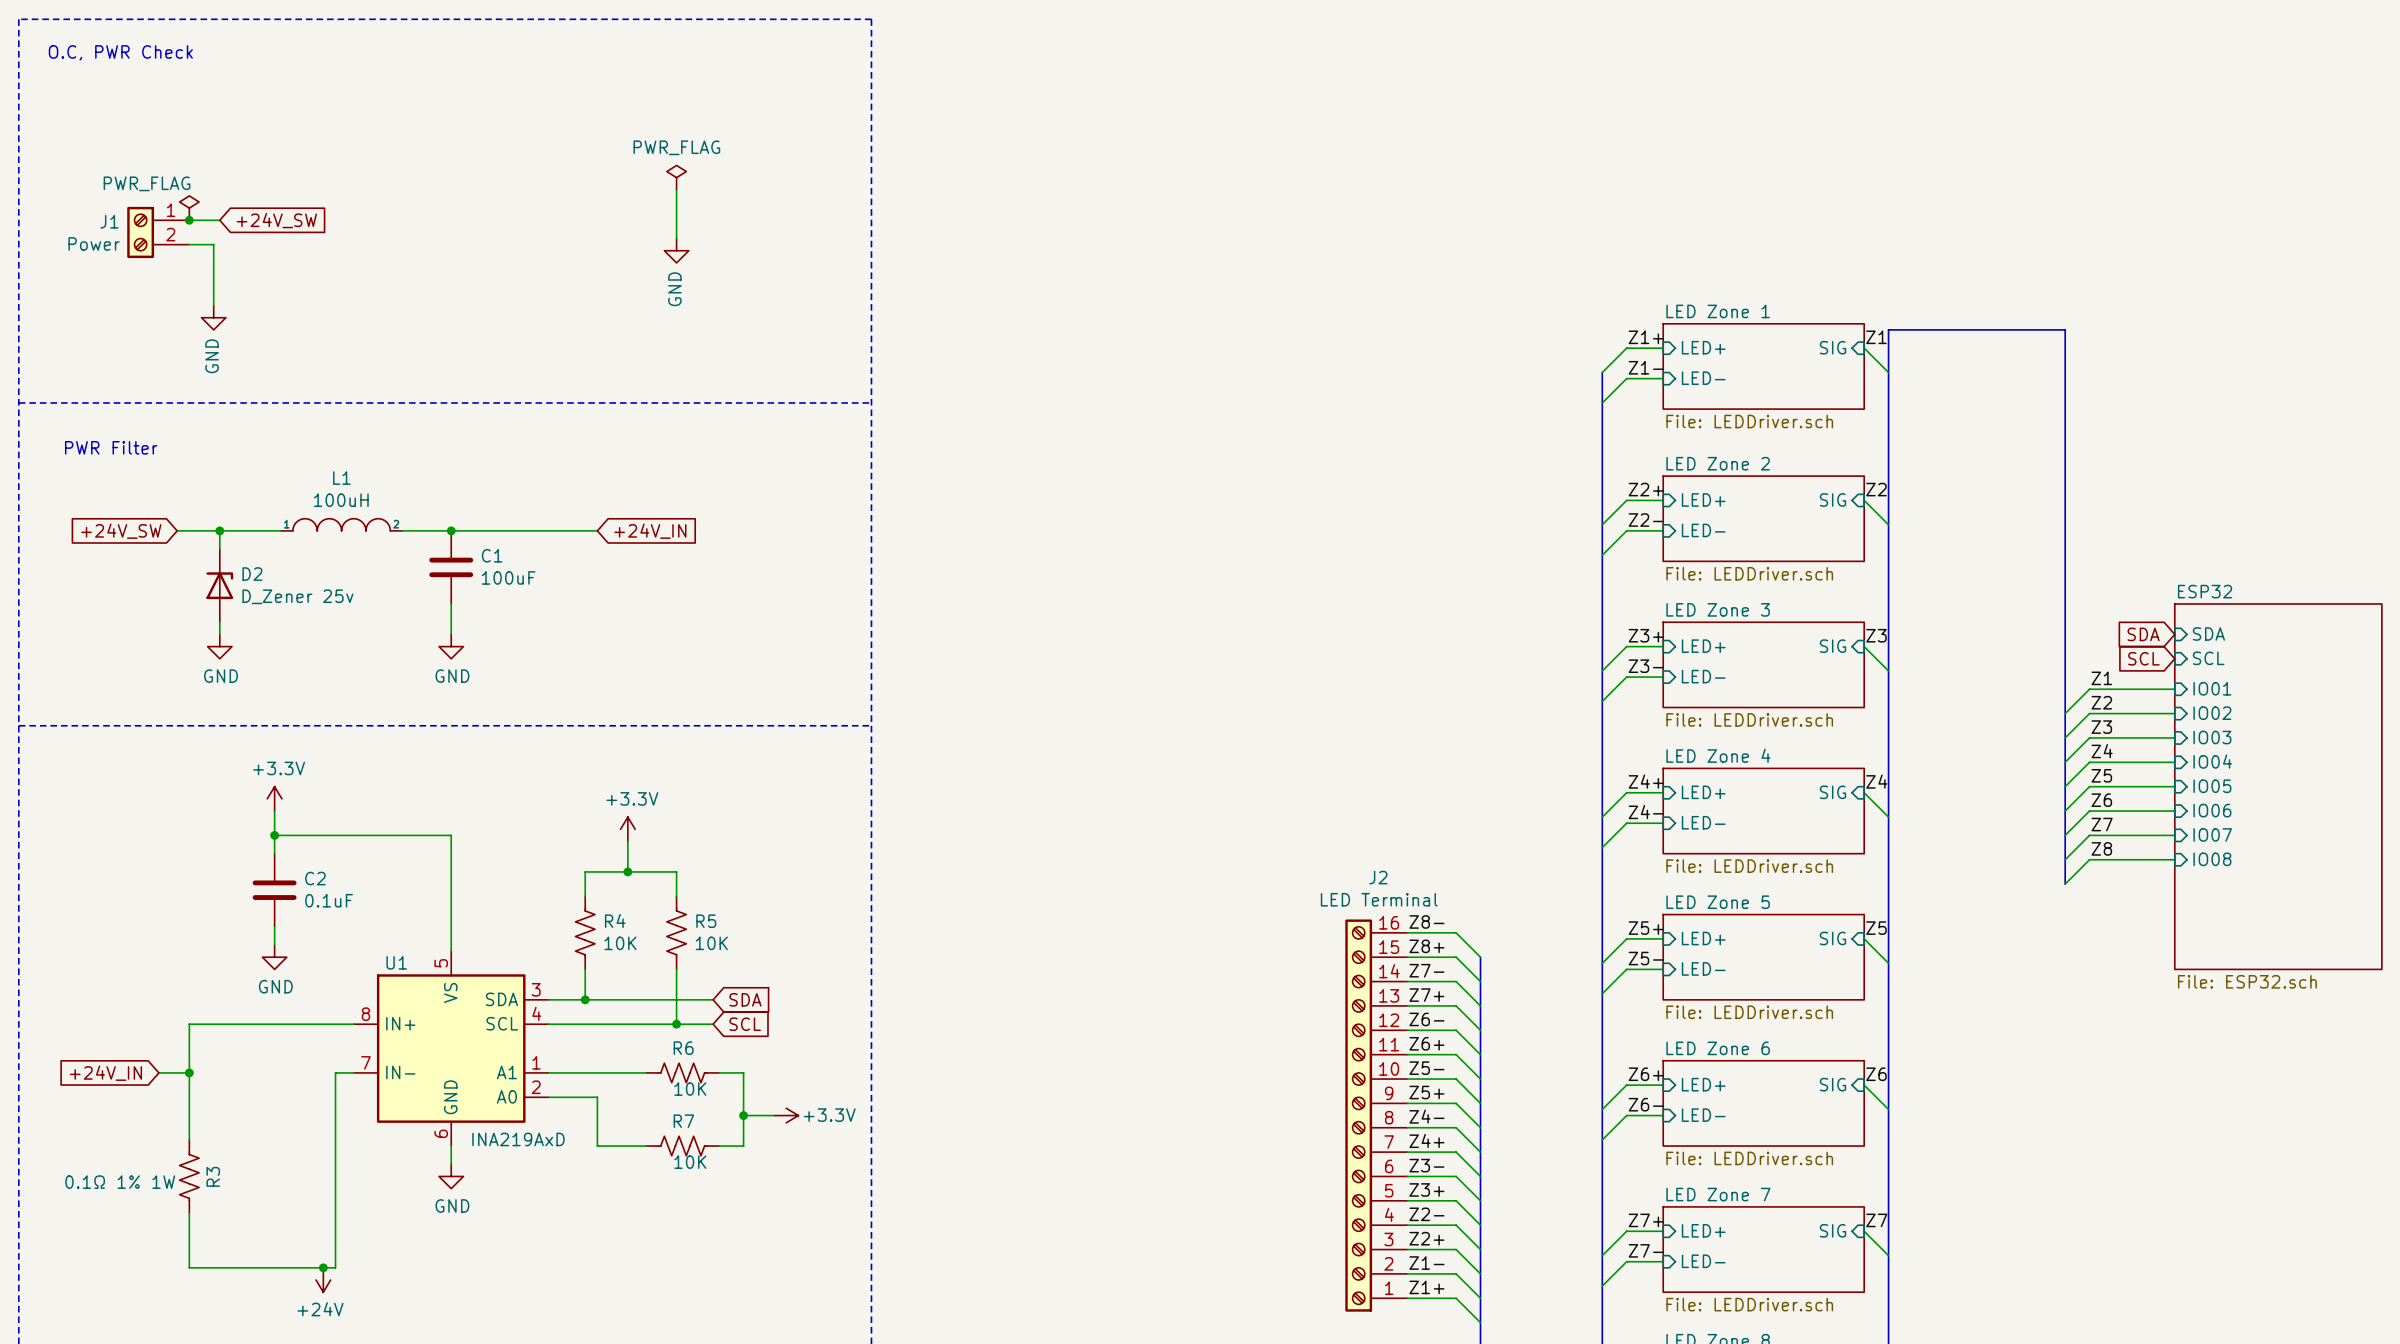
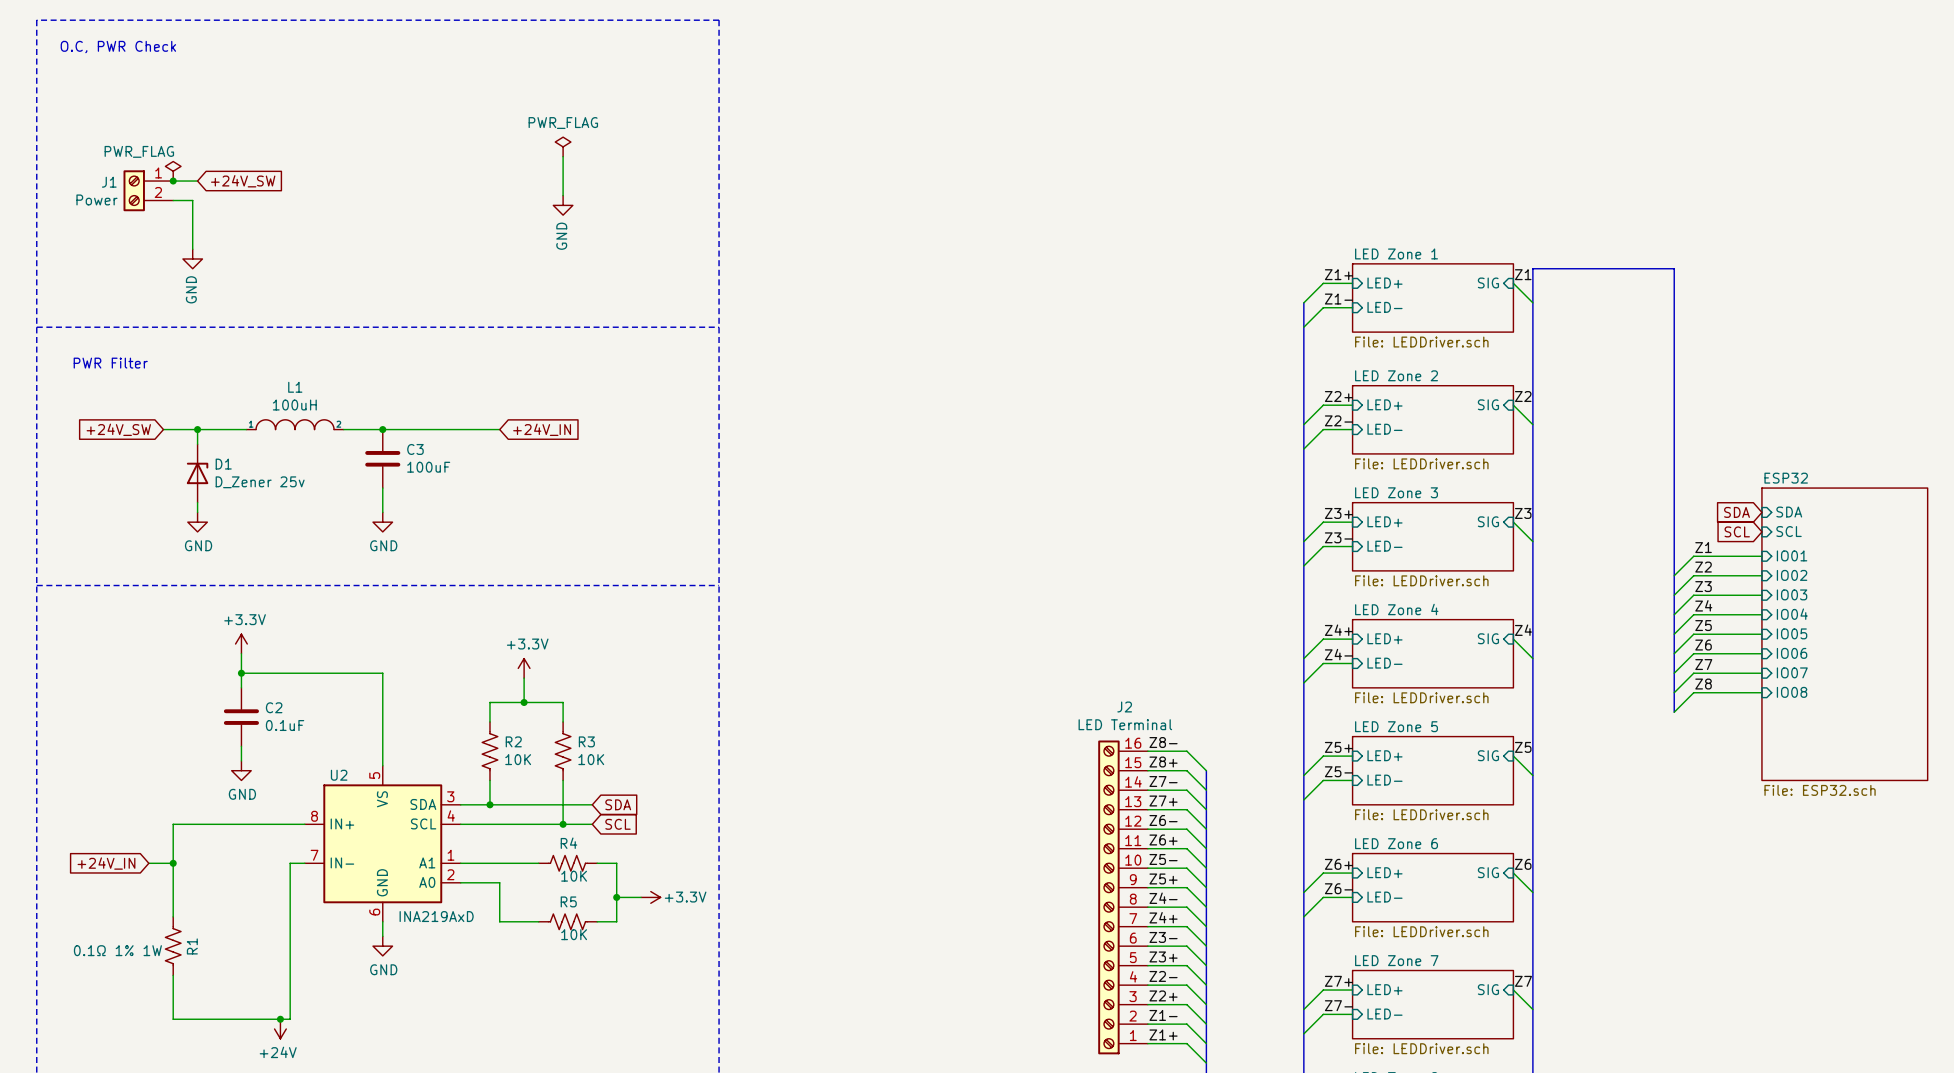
C1 name: C1 (492, 555) -> C3 (415, 449)
D2 name: D2 (252, 574) -> D1 (223, 464)
R4 name: R4 (615, 920) -> R2 (513, 741)
R5 name: R5 (706, 921) -> R3 (586, 741)
U1 name: U1 (396, 962) -> U2 (339, 775)
R6 name: R6 (683, 1048) -> R4 (568, 843)
R7 name: R7 (683, 1121) -> R5 (568, 901)
R3 name: R3 (213, 1176) -> R1 (192, 946)

